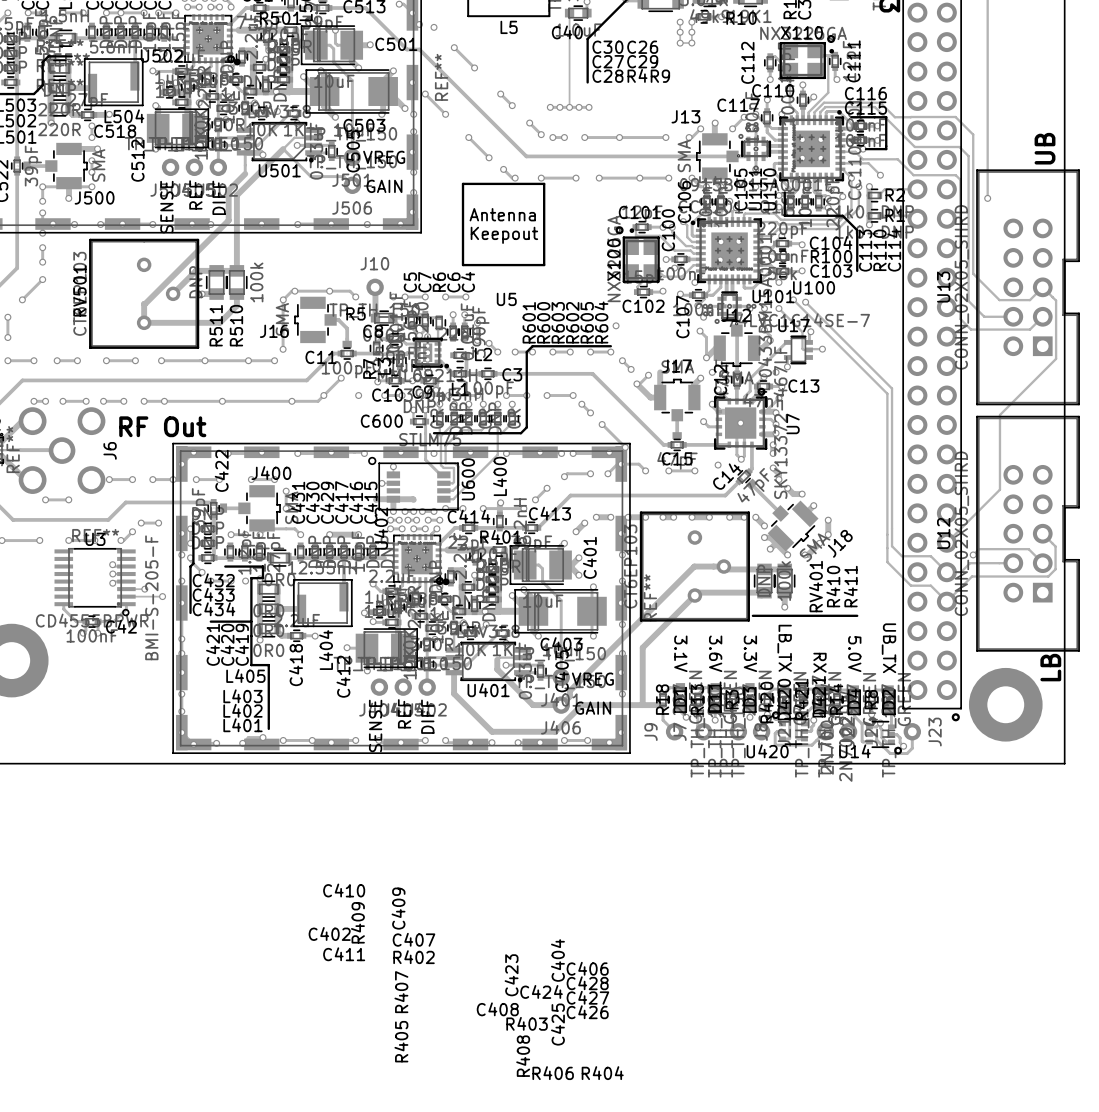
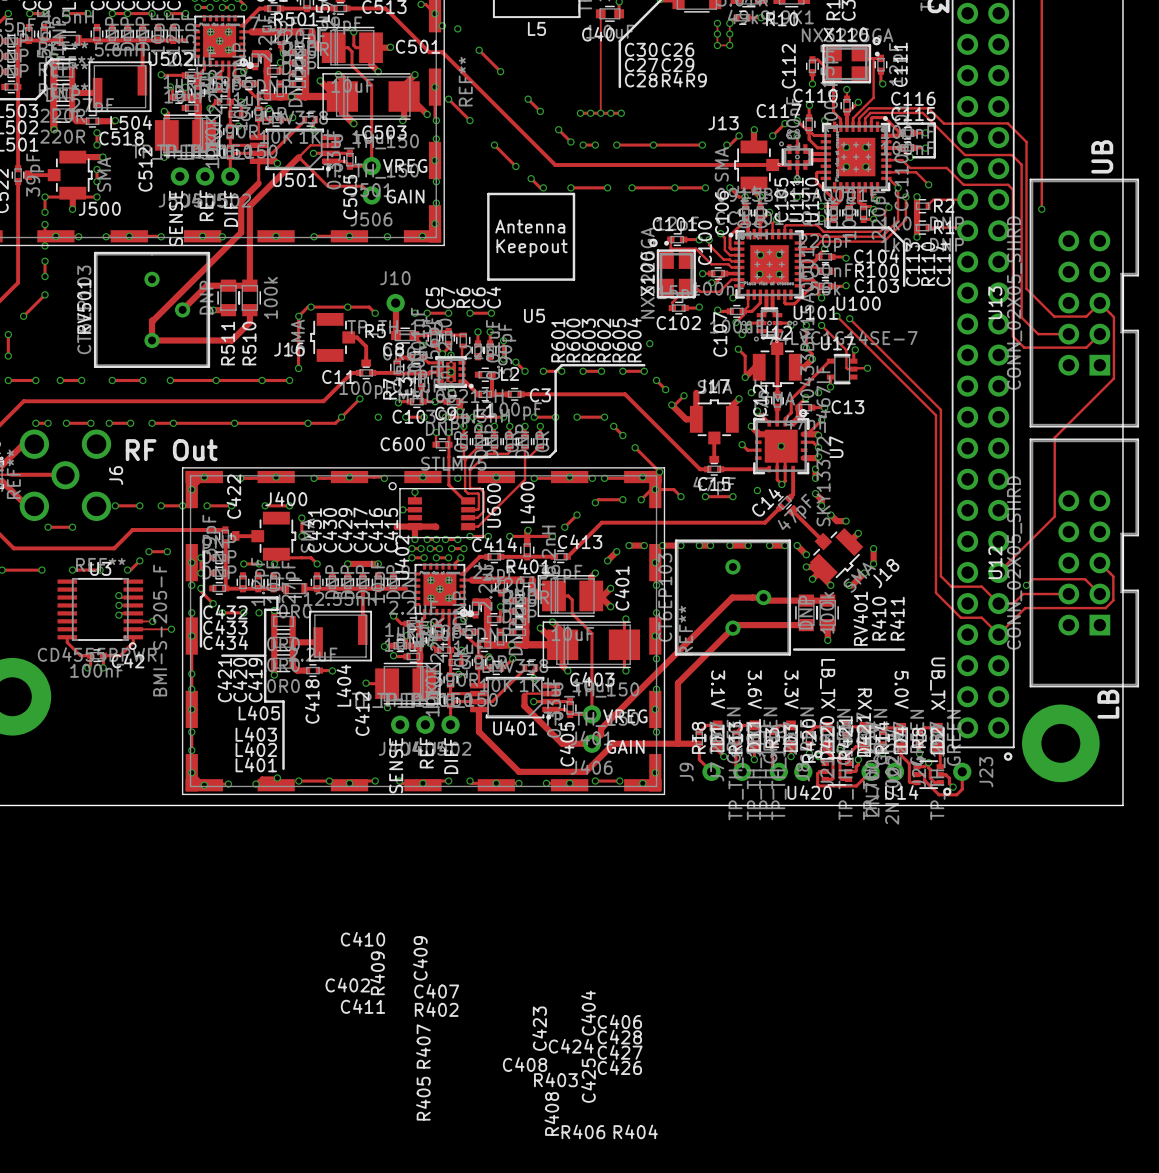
C505 name position: C505 (353, 151) -> C505 (350, 197)
C405 name position: C405 (561, 671) -> C405 (567, 744)

